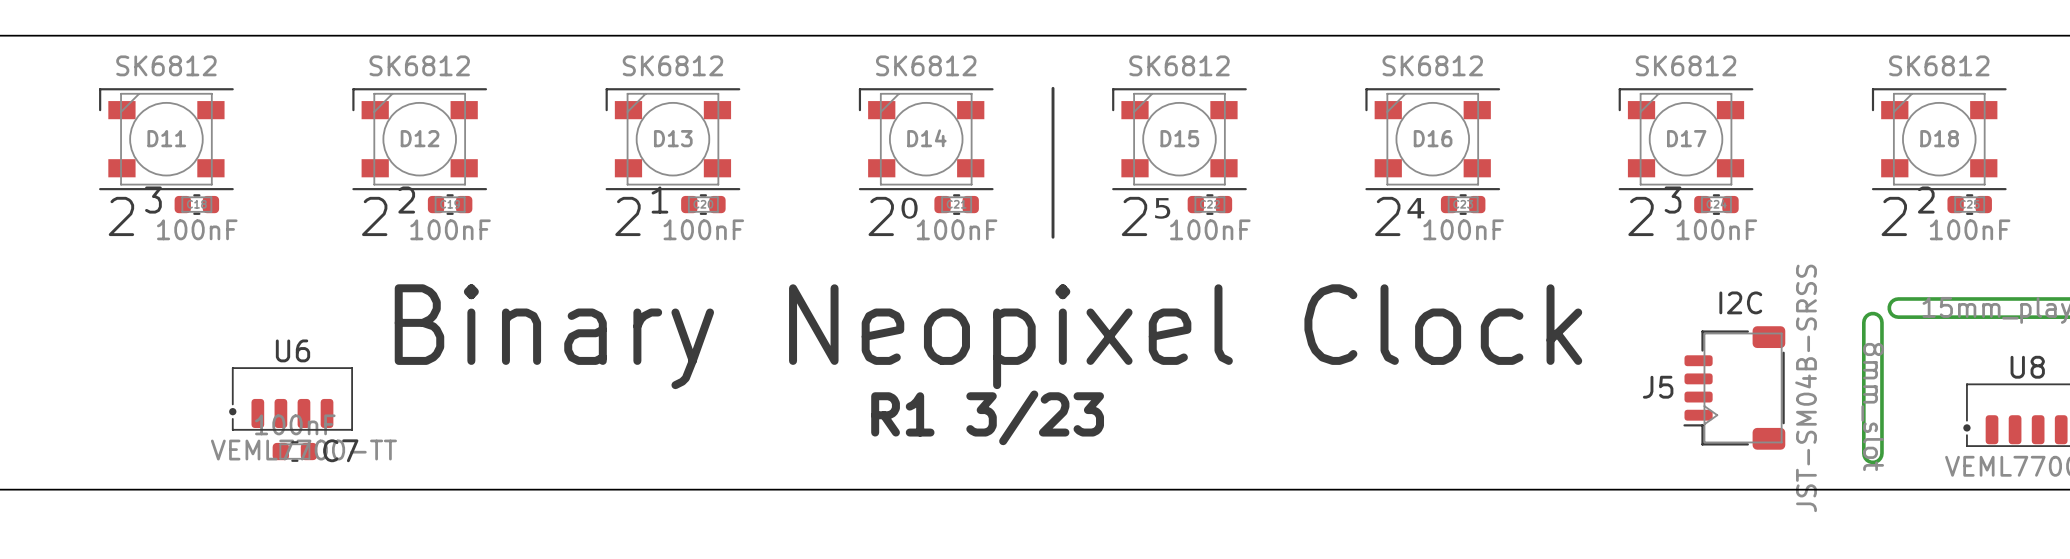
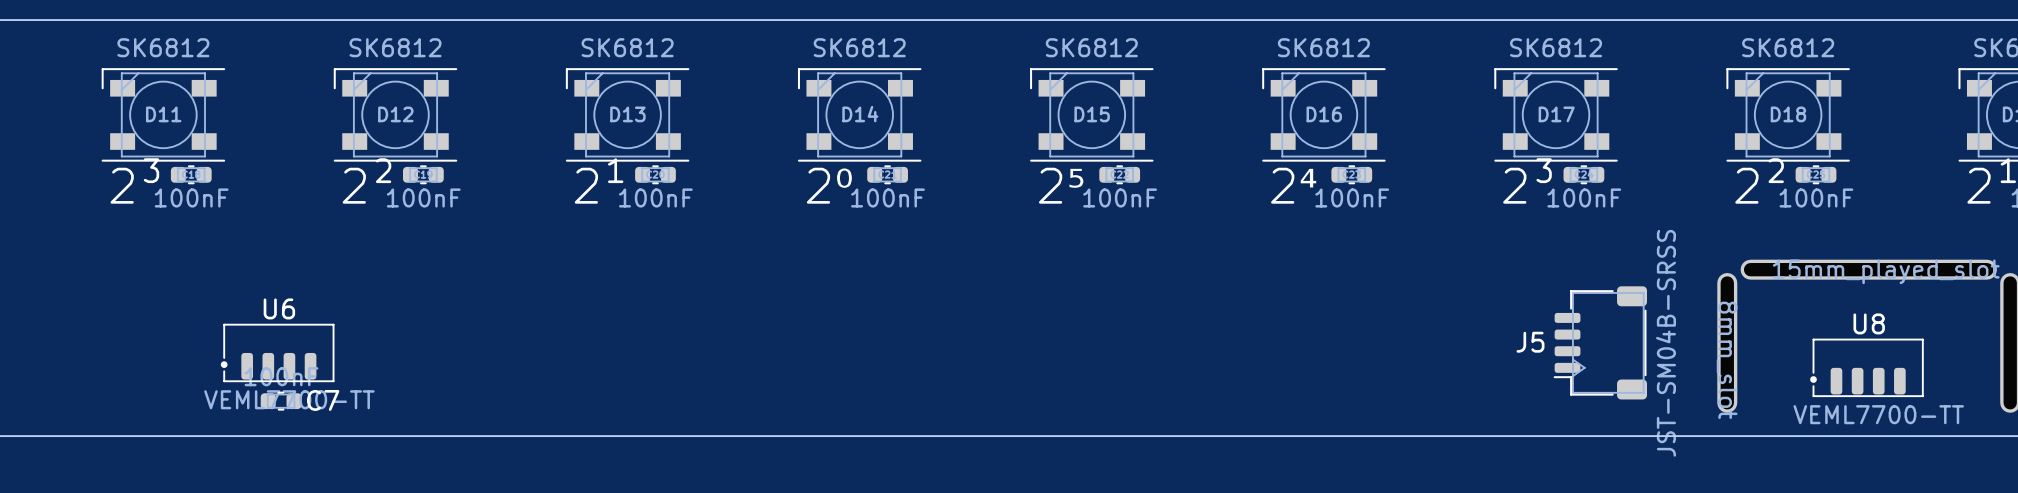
line: (1053, 88) (1053, 237) -> none
text: I2C (1740, 302) -> none
text: Binary Neopixel Clock (988, 336) -> none
text: R1 3/23 (987, 417) -> none

